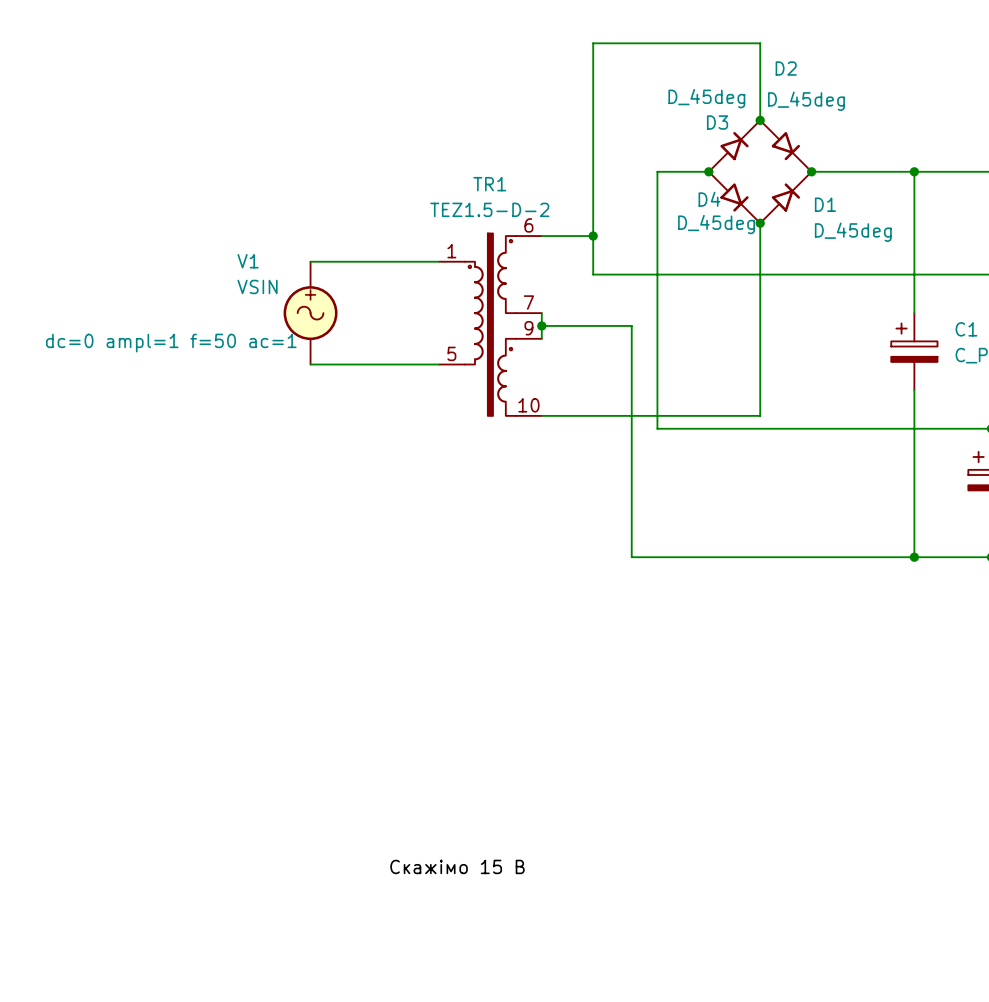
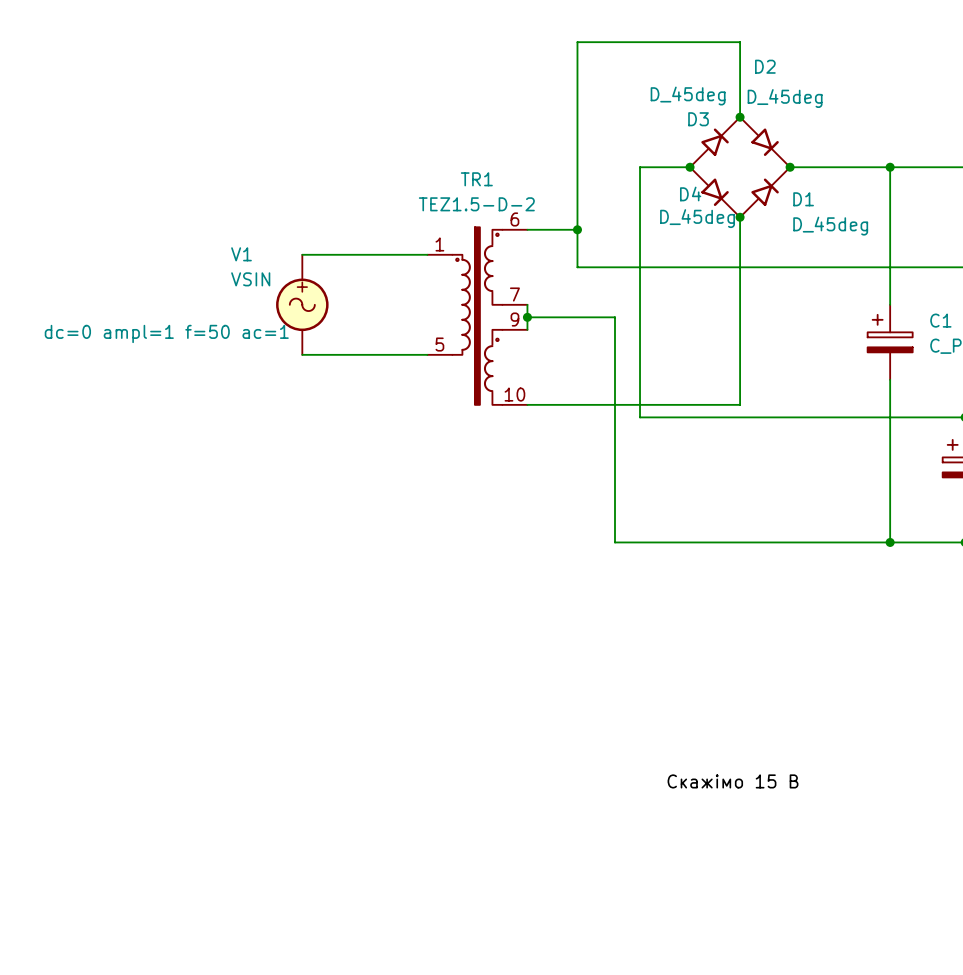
label: none -> Скажімо 15 В (733, 781)
label: Скажімо 15 В (457, 866) -> none

